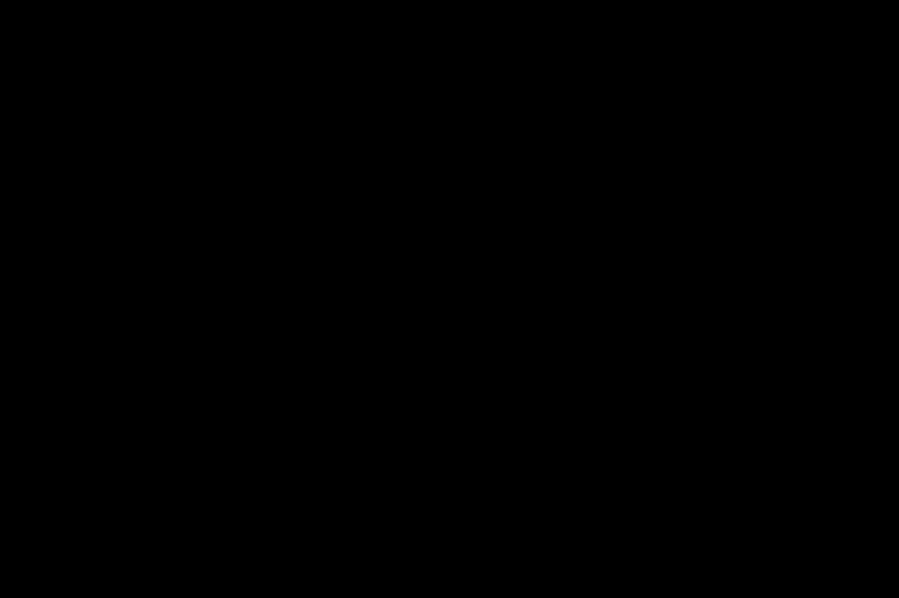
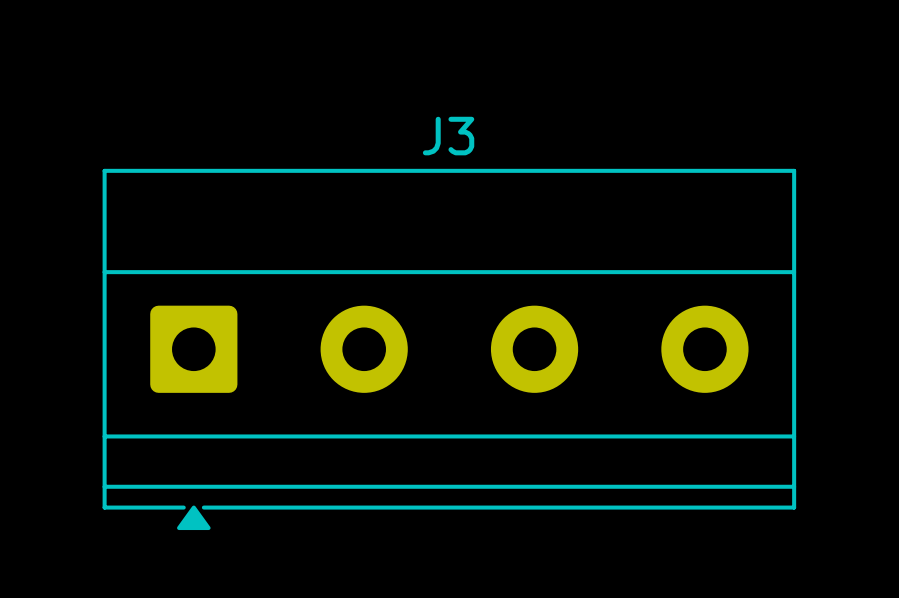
J3: none -> (449, 349)

